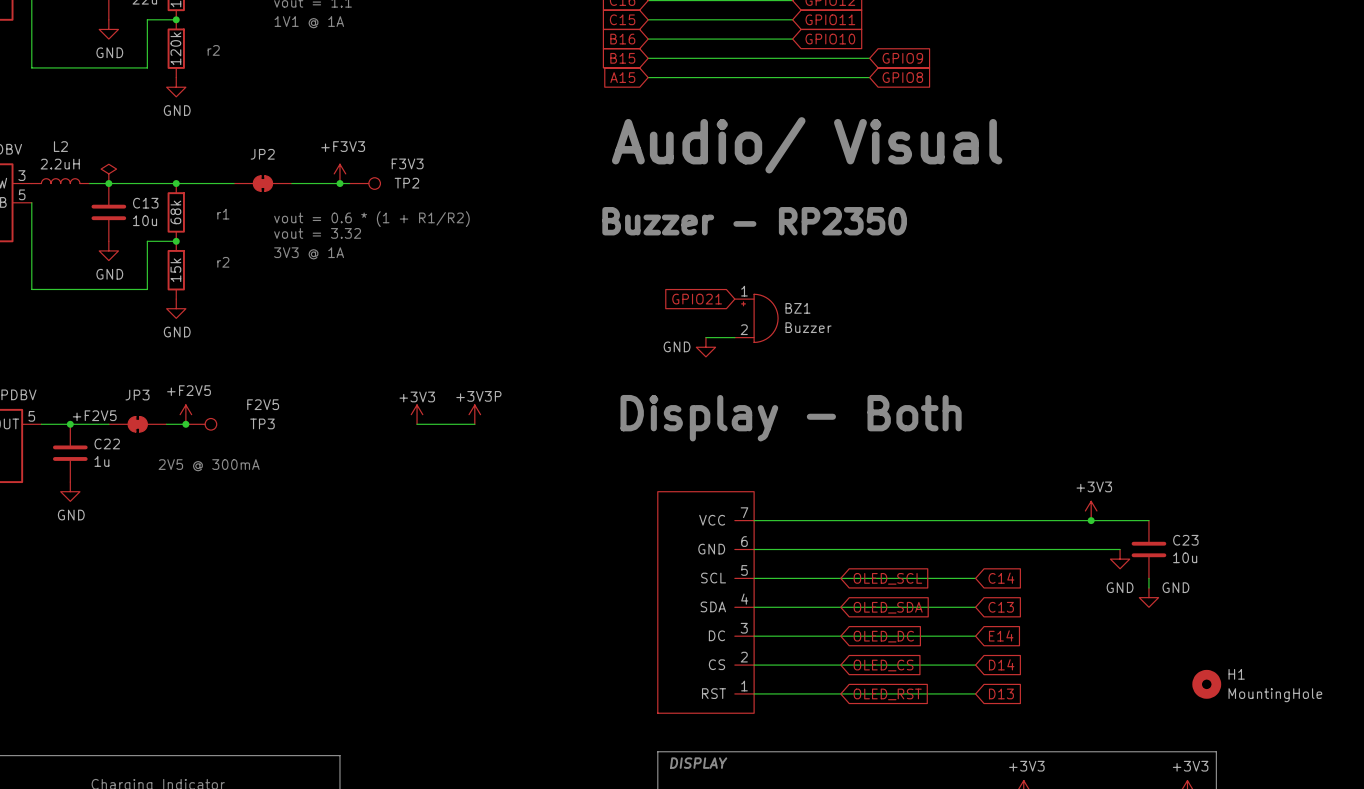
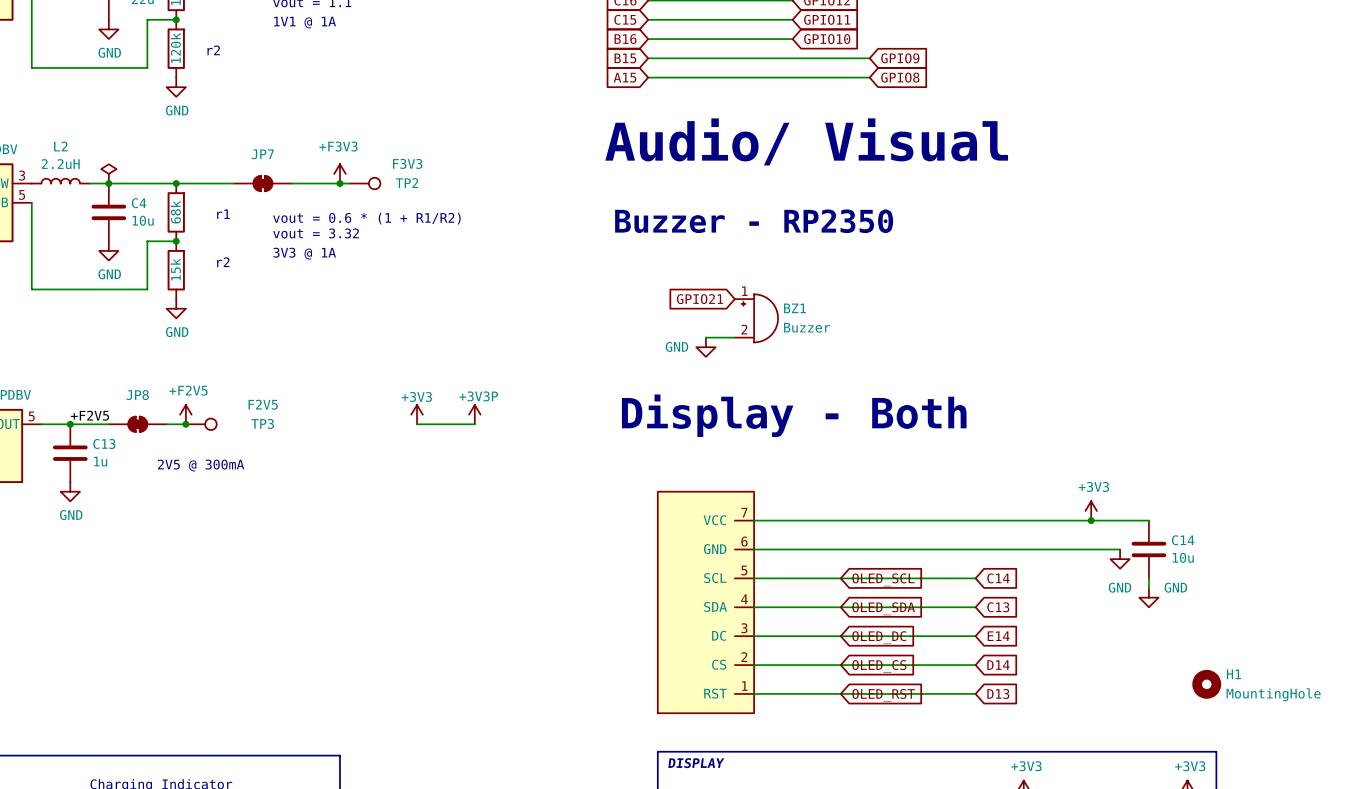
JP2 name: JP2 (262, 154) -> JP7 (262, 154)
C13 name: C13 (145, 203) -> C4 (139, 203)
JP3 name: JP3 (137, 395) -> JP8 (137, 395)
C22 name: C22 (107, 443) -> C13 (104, 443)
C23 name: C23 (1185, 540) -> C14 (1183, 540)

